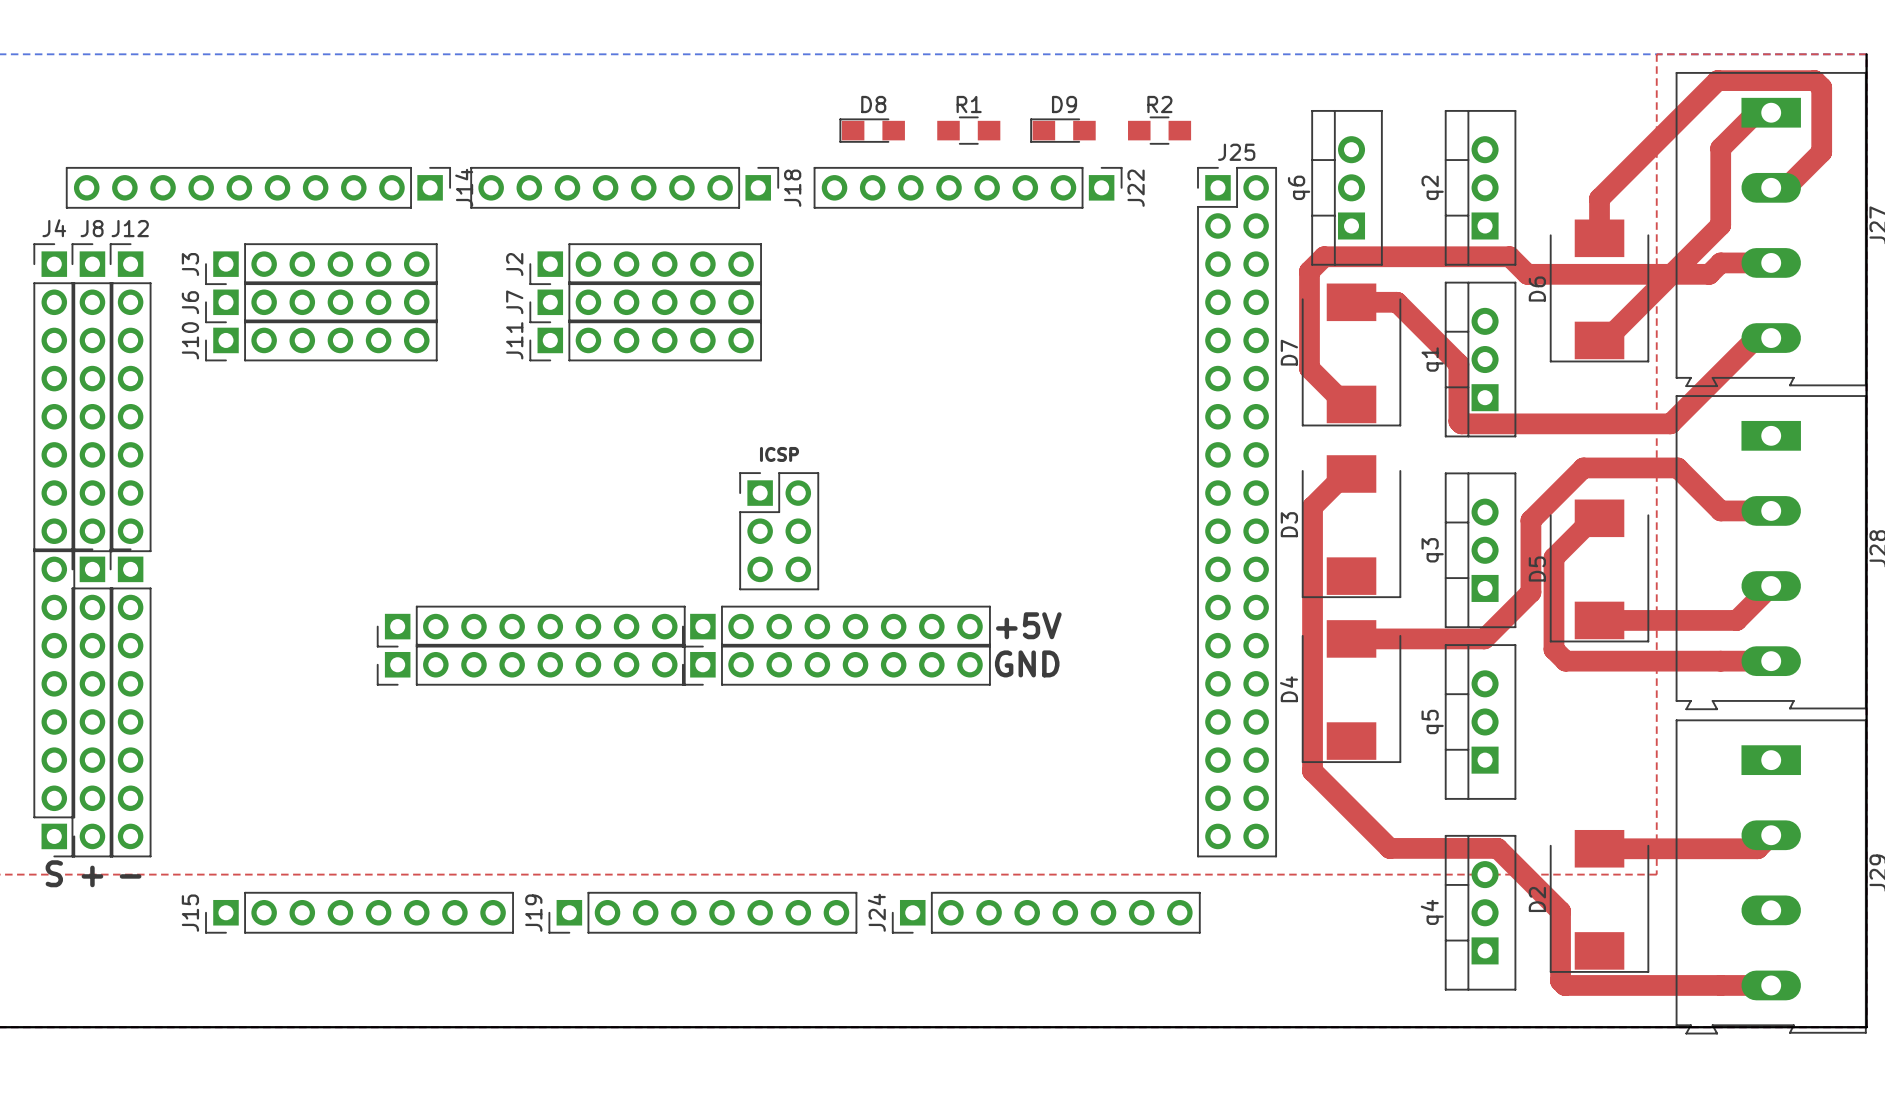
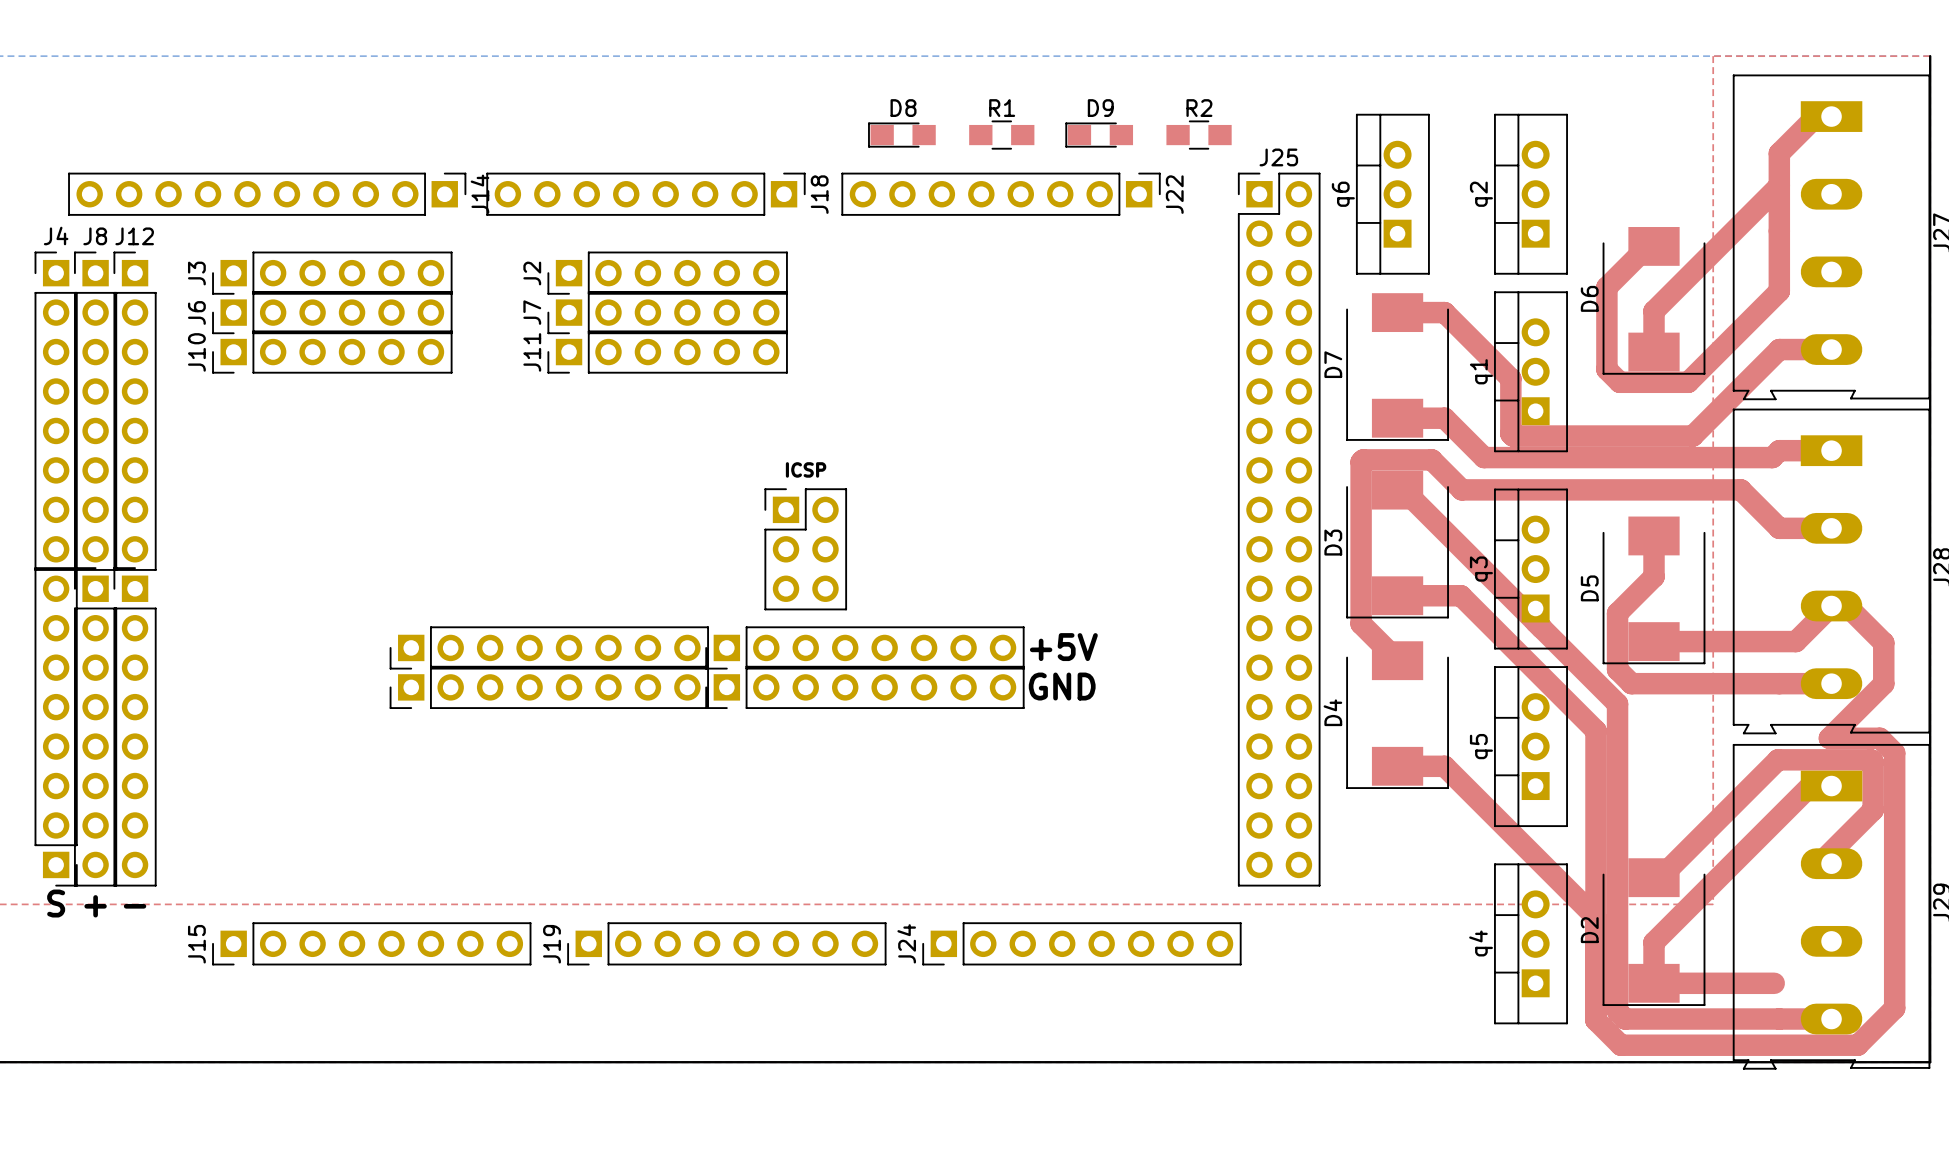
top track: (1771, 187) (1786, 187) (1821, 152) (1821, 87) (1814, 80) (1717, 80) (1599, 198) (1599, 238) -> (1779, 232) (1779, 291) (1688, 382) (1619, 382) (1606, 369) (1606, 287) (1647, 246) (1654, 246)
top track: (1720, 225) (1605, 340) (1599, 340) -> (1779, 185) (1654, 311) (1654, 352)
top track: (1771, 262) (1720, 262) (1709, 274) (1527, 274) (1509, 256) (1324, 256) (1309, 271) (1309, 368) (1345, 404) (1351, 404) -> (1831, 450) (1779, 450) (1772, 457) (1484, 457) (1444, 418) (1397, 418)
top track: (1756, 338) (1670, 423) (1461, 423) (1458, 421) (1458, 364) -> (1816, 349) (1779, 349) (1692, 436) (1513, 436) (1510, 433) (1510, 378) (1508, 376)
top track: (1351, 473) (1345, 473) (1312, 506) (1312, 771) (1389, 848) (1497, 848) (1560, 911) (1560, 981) (1564, 985) (1571, 985) -> (1397, 490) (1403, 490) (1617, 703) (1617, 1011) (1625, 1019)
top track: (1683, 473) (1677, 467) (1583, 467) (1530, 520) (1530, 592) (1484, 638) (1351, 638) -> (1740, 489) (1461, 489) (1431, 459) (1363, 459) (1361, 462) (1361, 623) (1397, 660)
top track: (1599, 518) (1593, 518) (1553, 557) (1553, 649) (1565, 661) (1577, 661) -> (1654, 535) (1654, 576) (1617, 613) (1617, 669) (1631, 683)
top track: none -> (1397, 595) (1460, 595) (1595, 730) (1595, 1020) (1620, 1045) (1857, 1045) (1894, 1008) (1894, 753) (1879, 738) (1829, 738) (1883, 683) (1883, 642) (1846, 606) (1831, 606)
top track: none -> (1397, 766) (1444, 766) (1595, 917)
top track: none -> (1831, 786) (1810, 786) (1654, 942) (1654, 983) (1774, 983)
top track: (1770, 836) (1757, 848) (1605, 848) -> (1830, 864) (1818, 864) (1873, 810) (1873, 762) (1870, 759) (1778, 759) (1660, 877)

